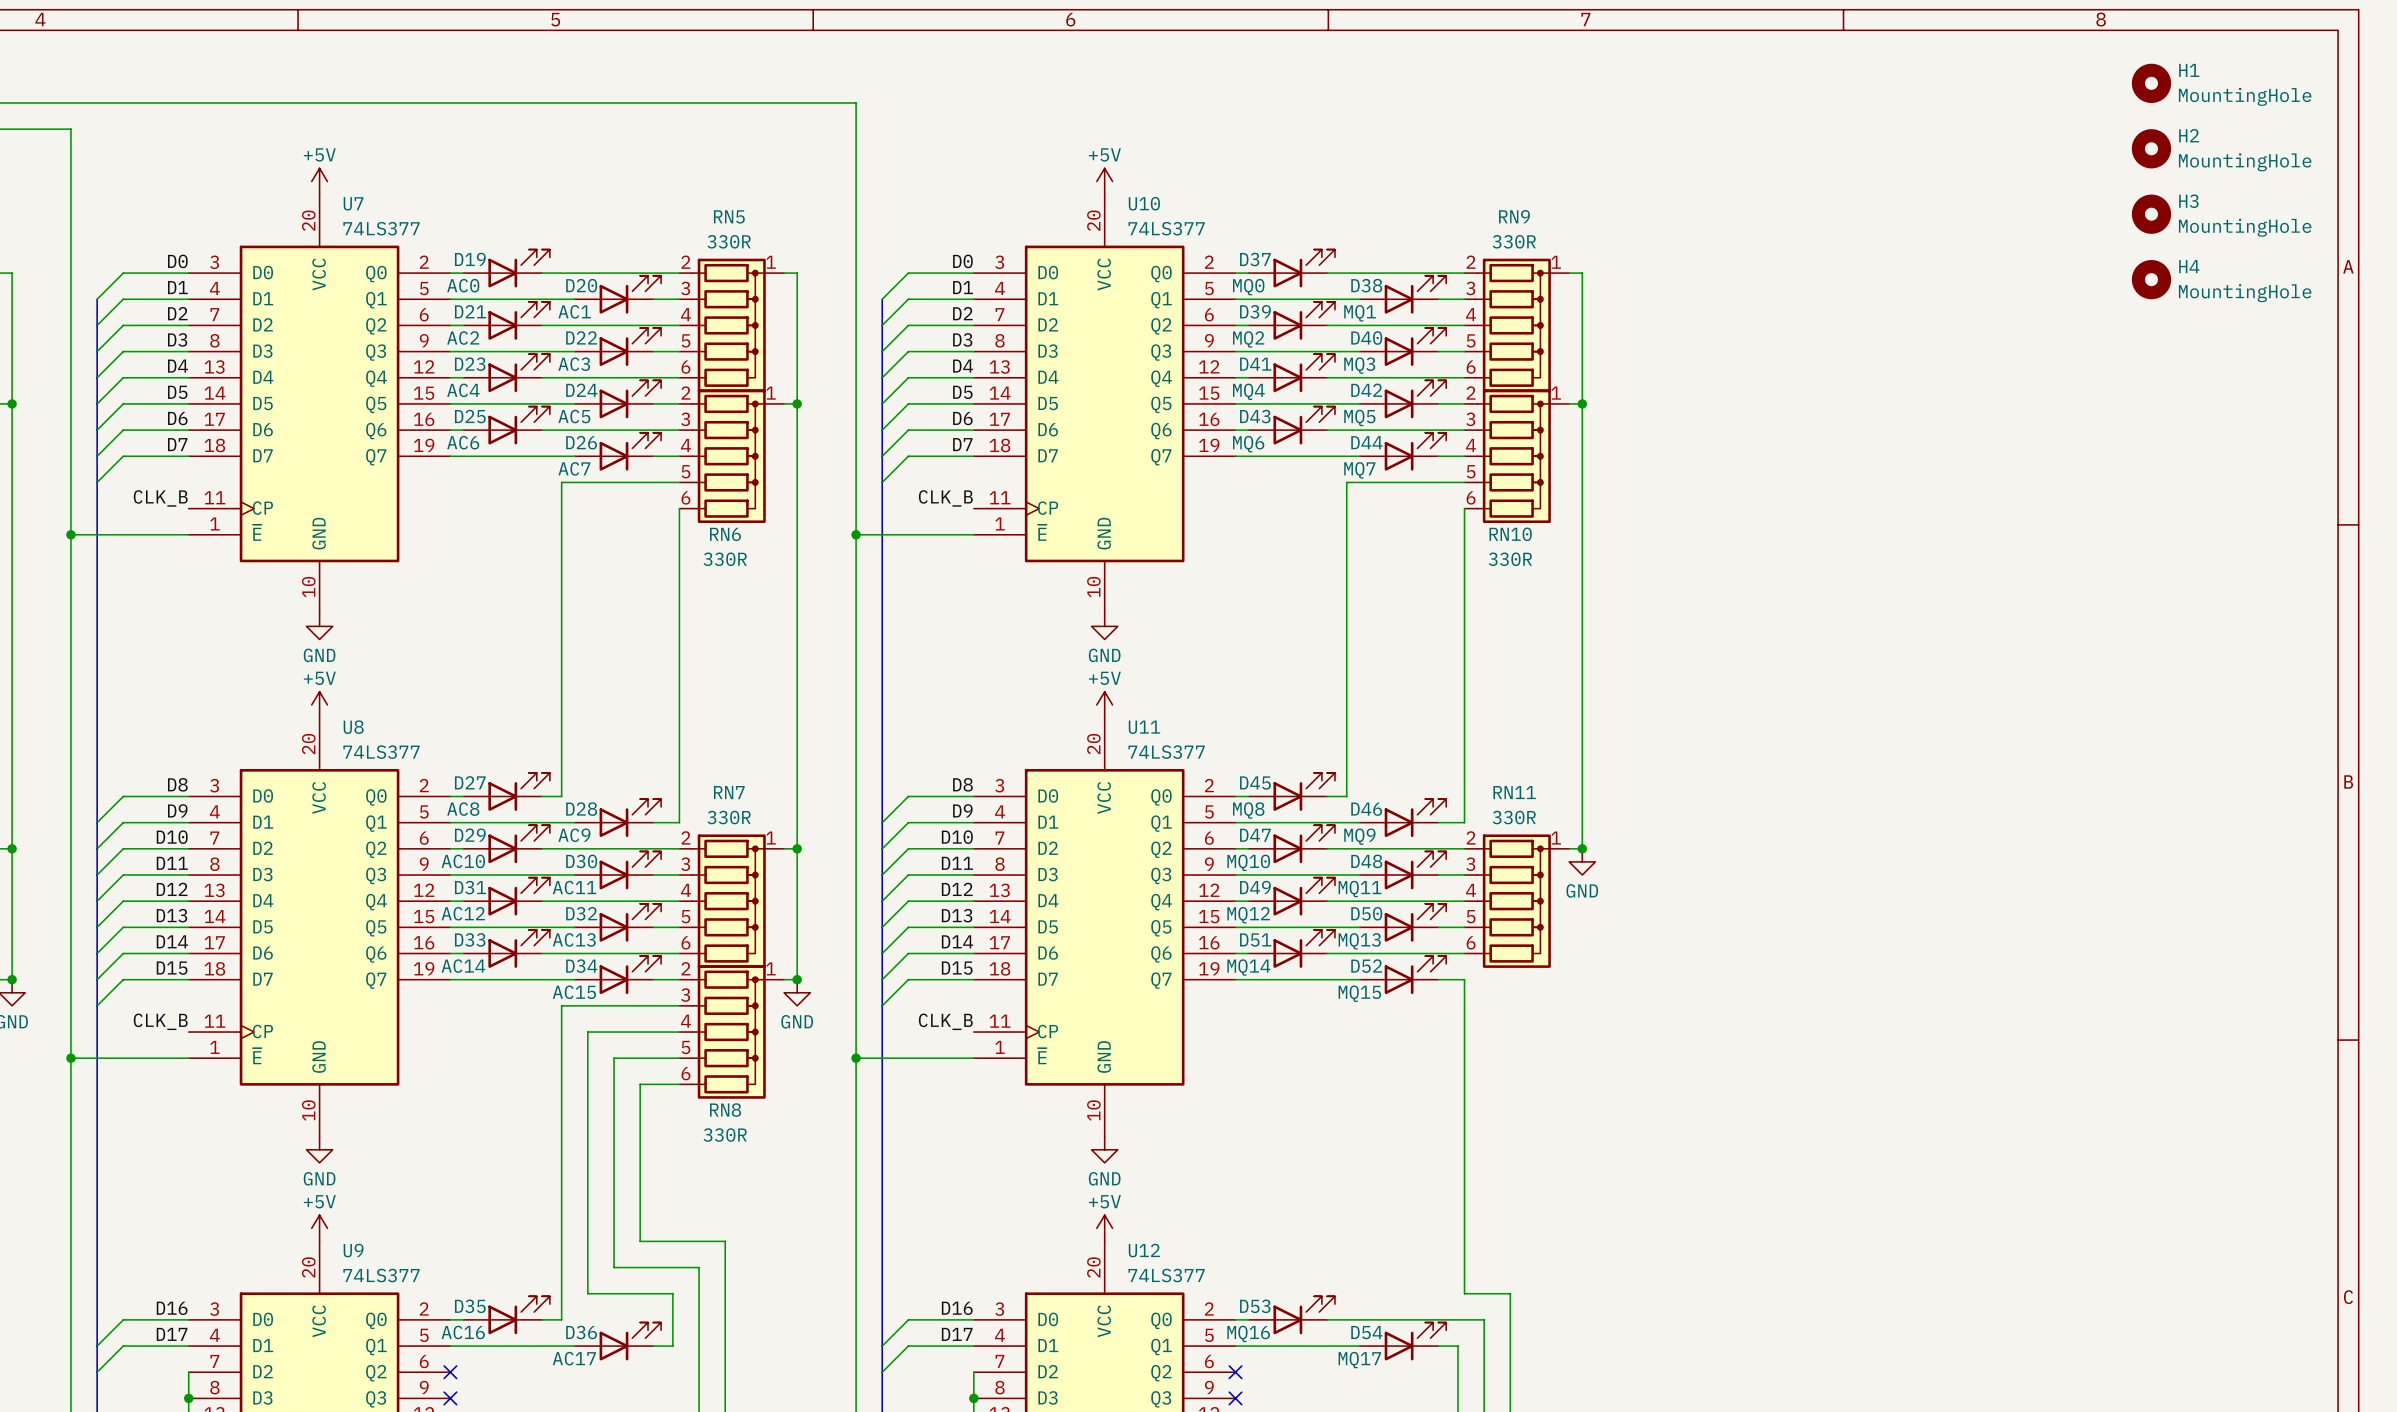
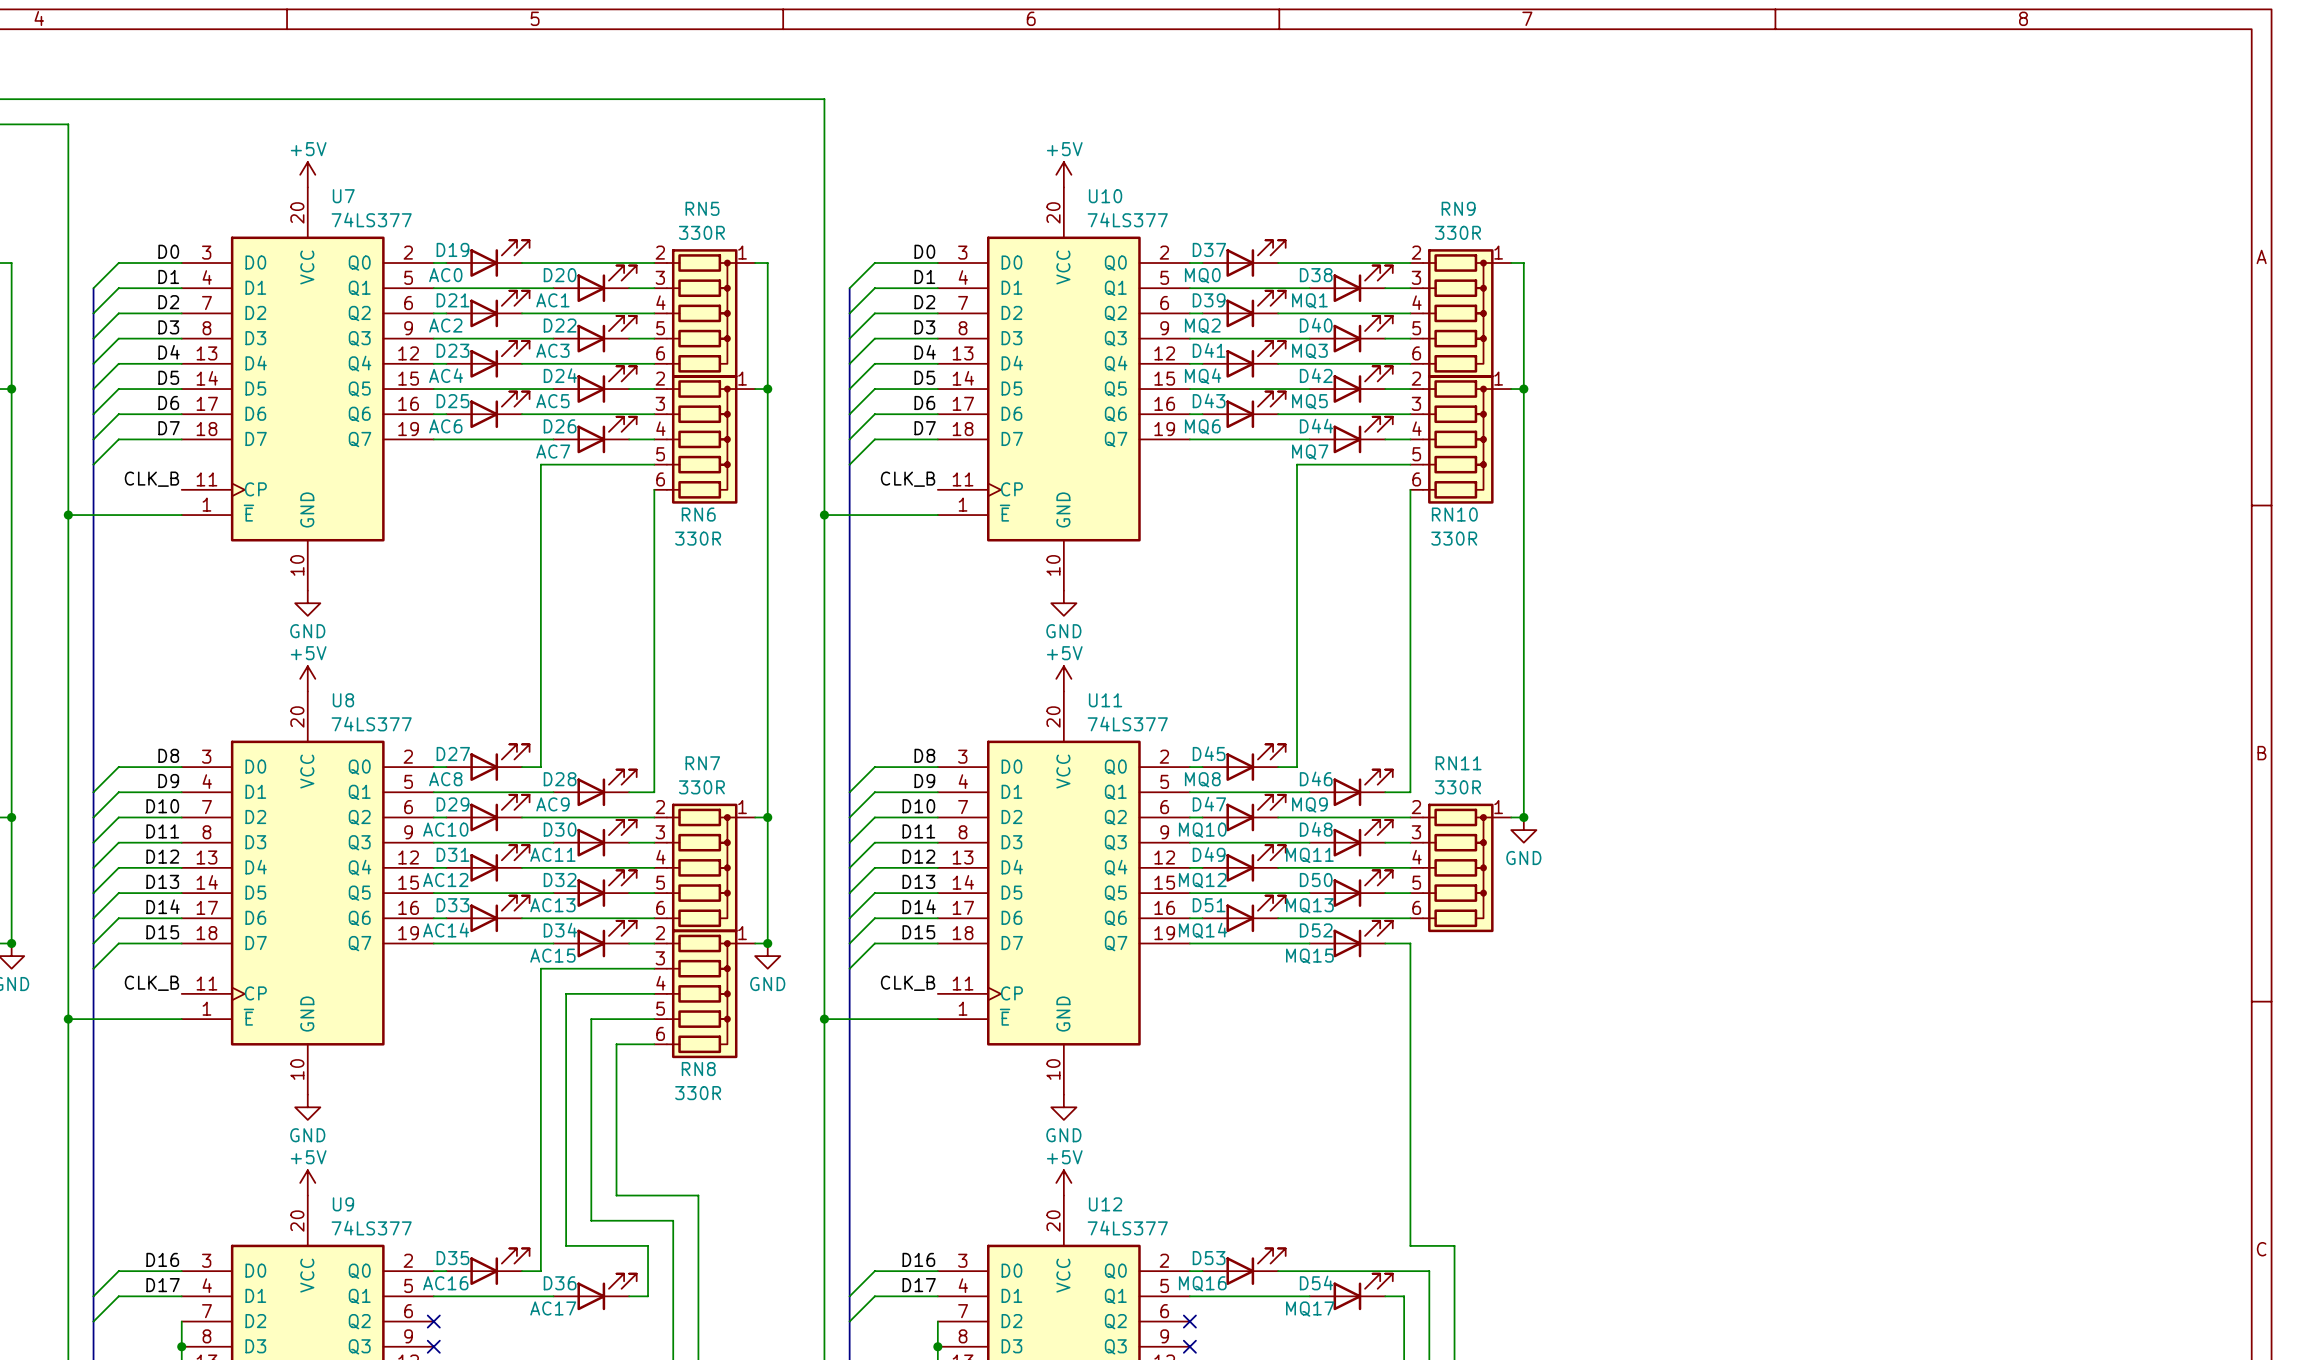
H1: MountingHole (2151, 83) -> none
H2: MountingHole (2151, 148) -> none
H3: MountingHole (2151, 214) -> none
H4: MountingHole (2151, 279) -> none

